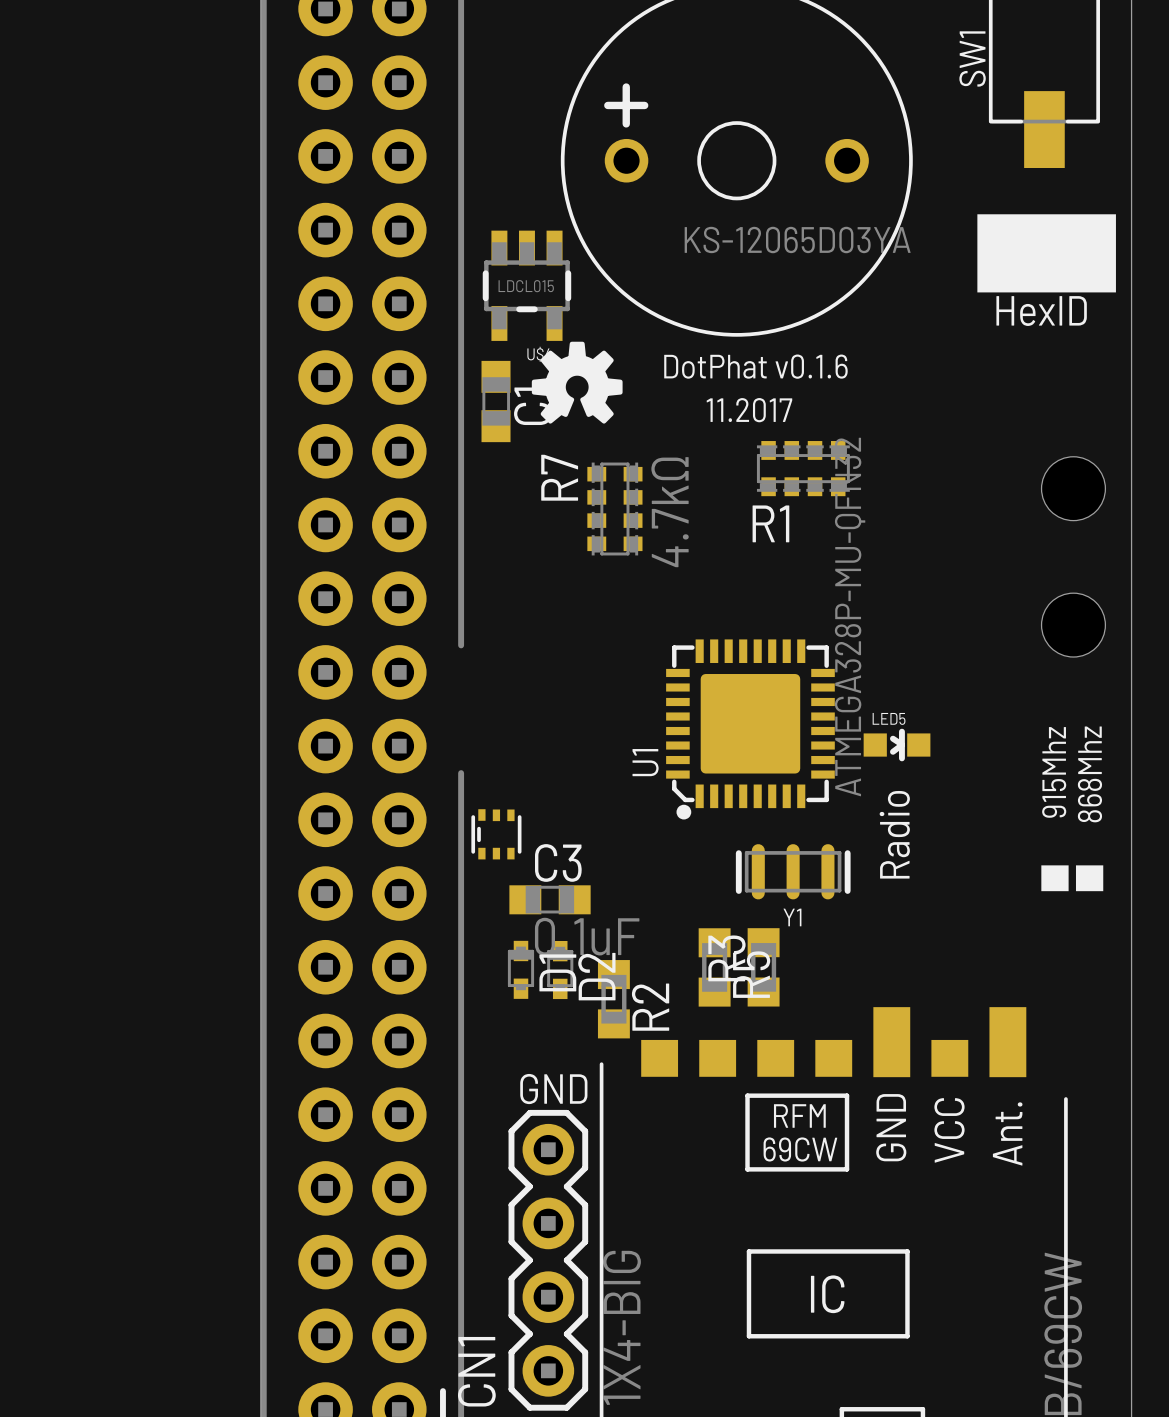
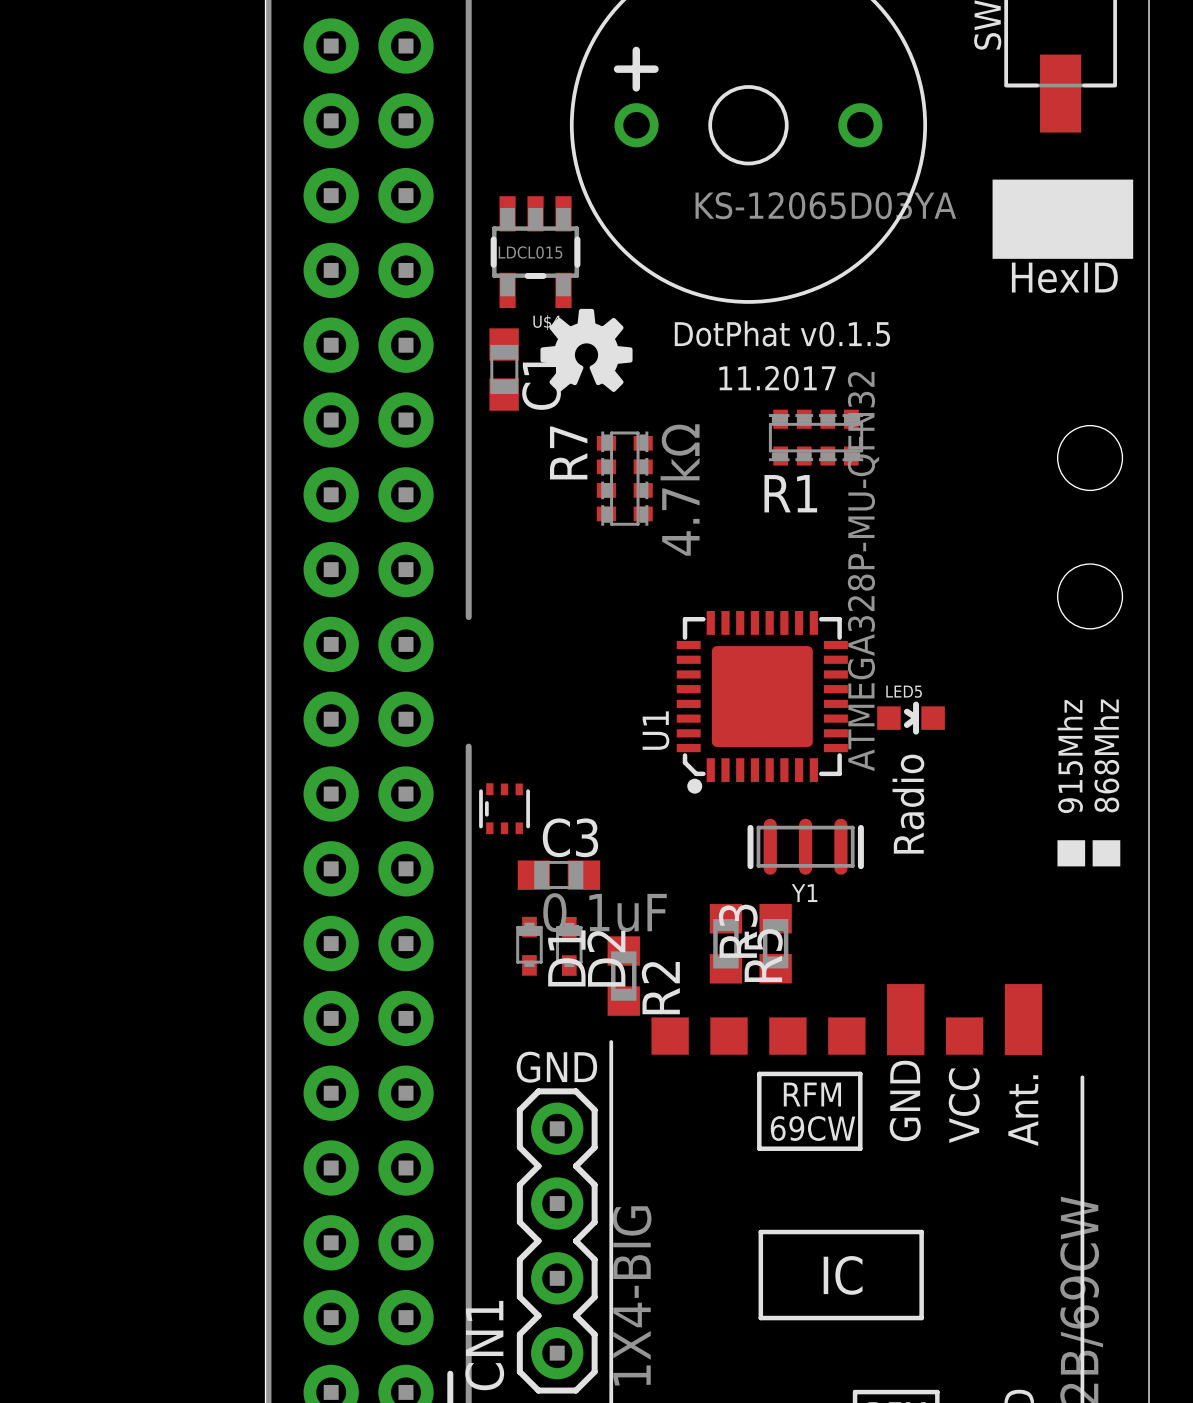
text: DotPhat v0.1.6 (755, 366) -> DotPhat v0.1.5 (782, 333)

